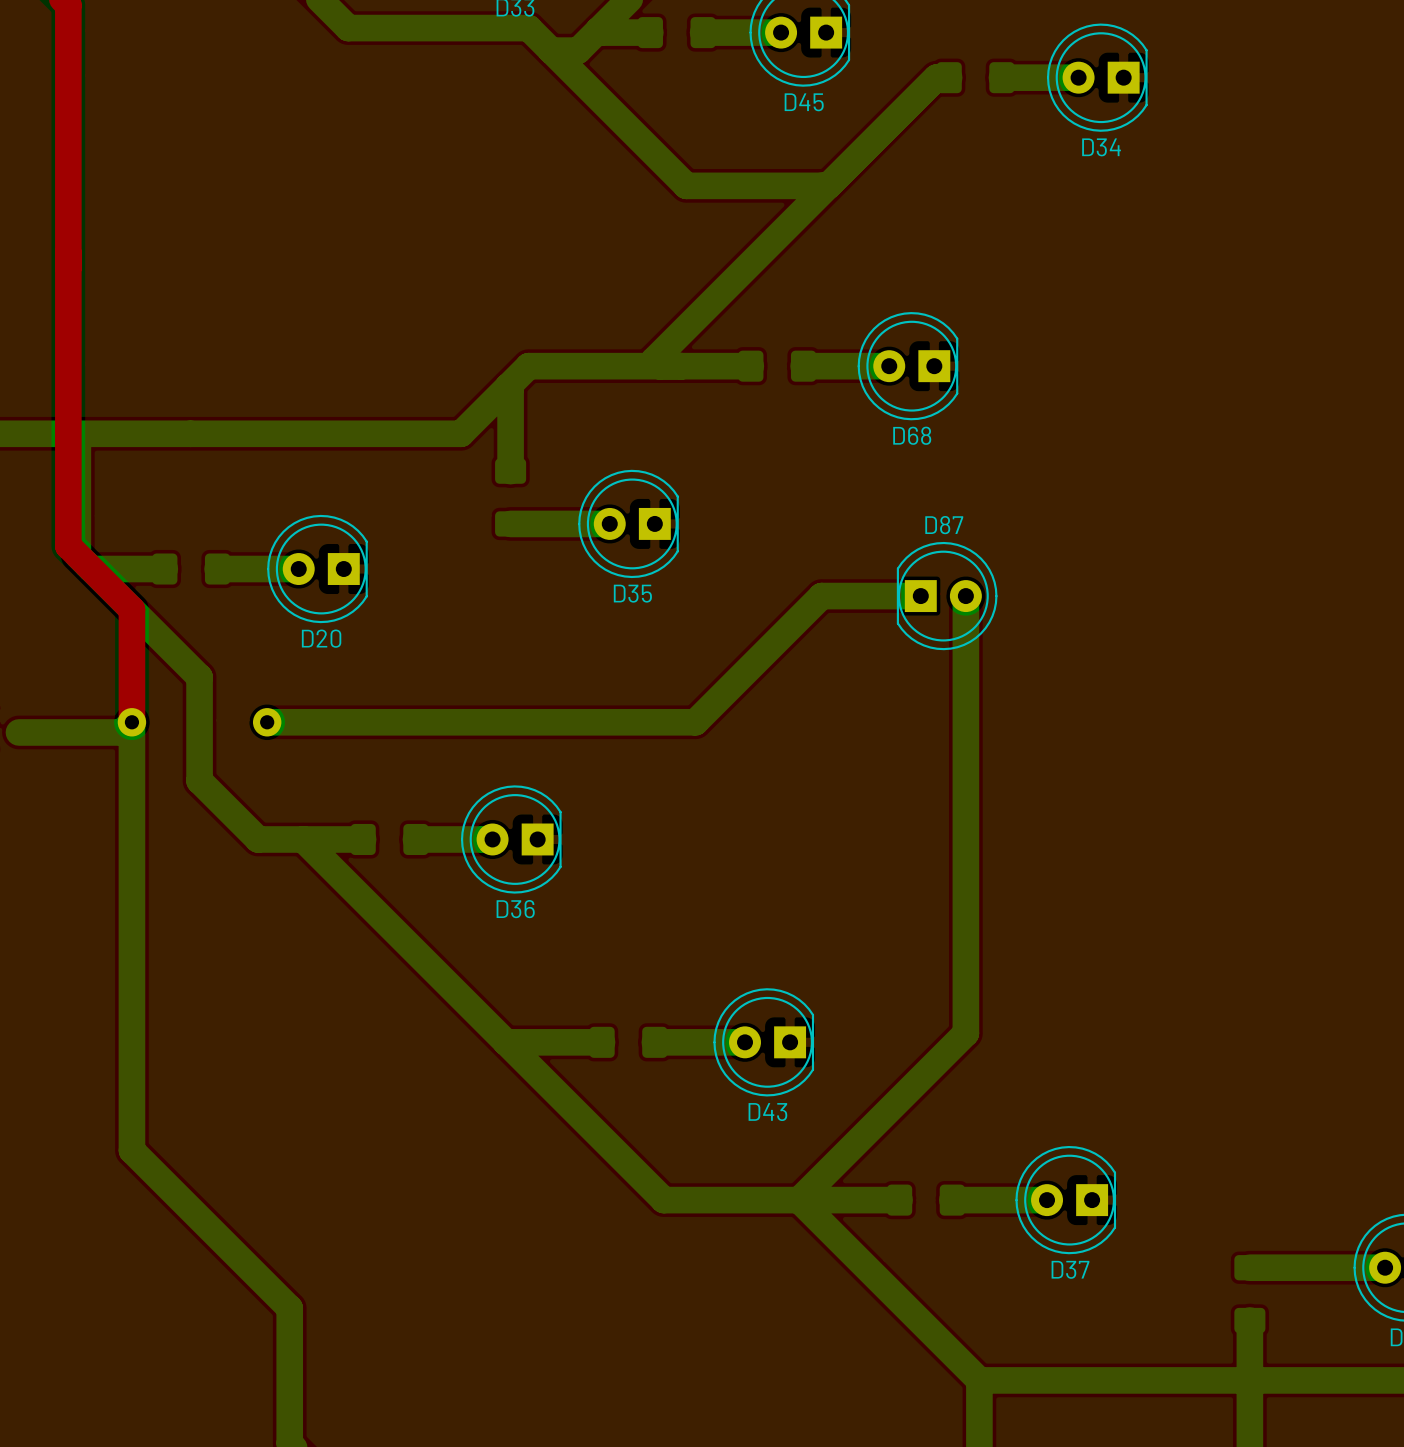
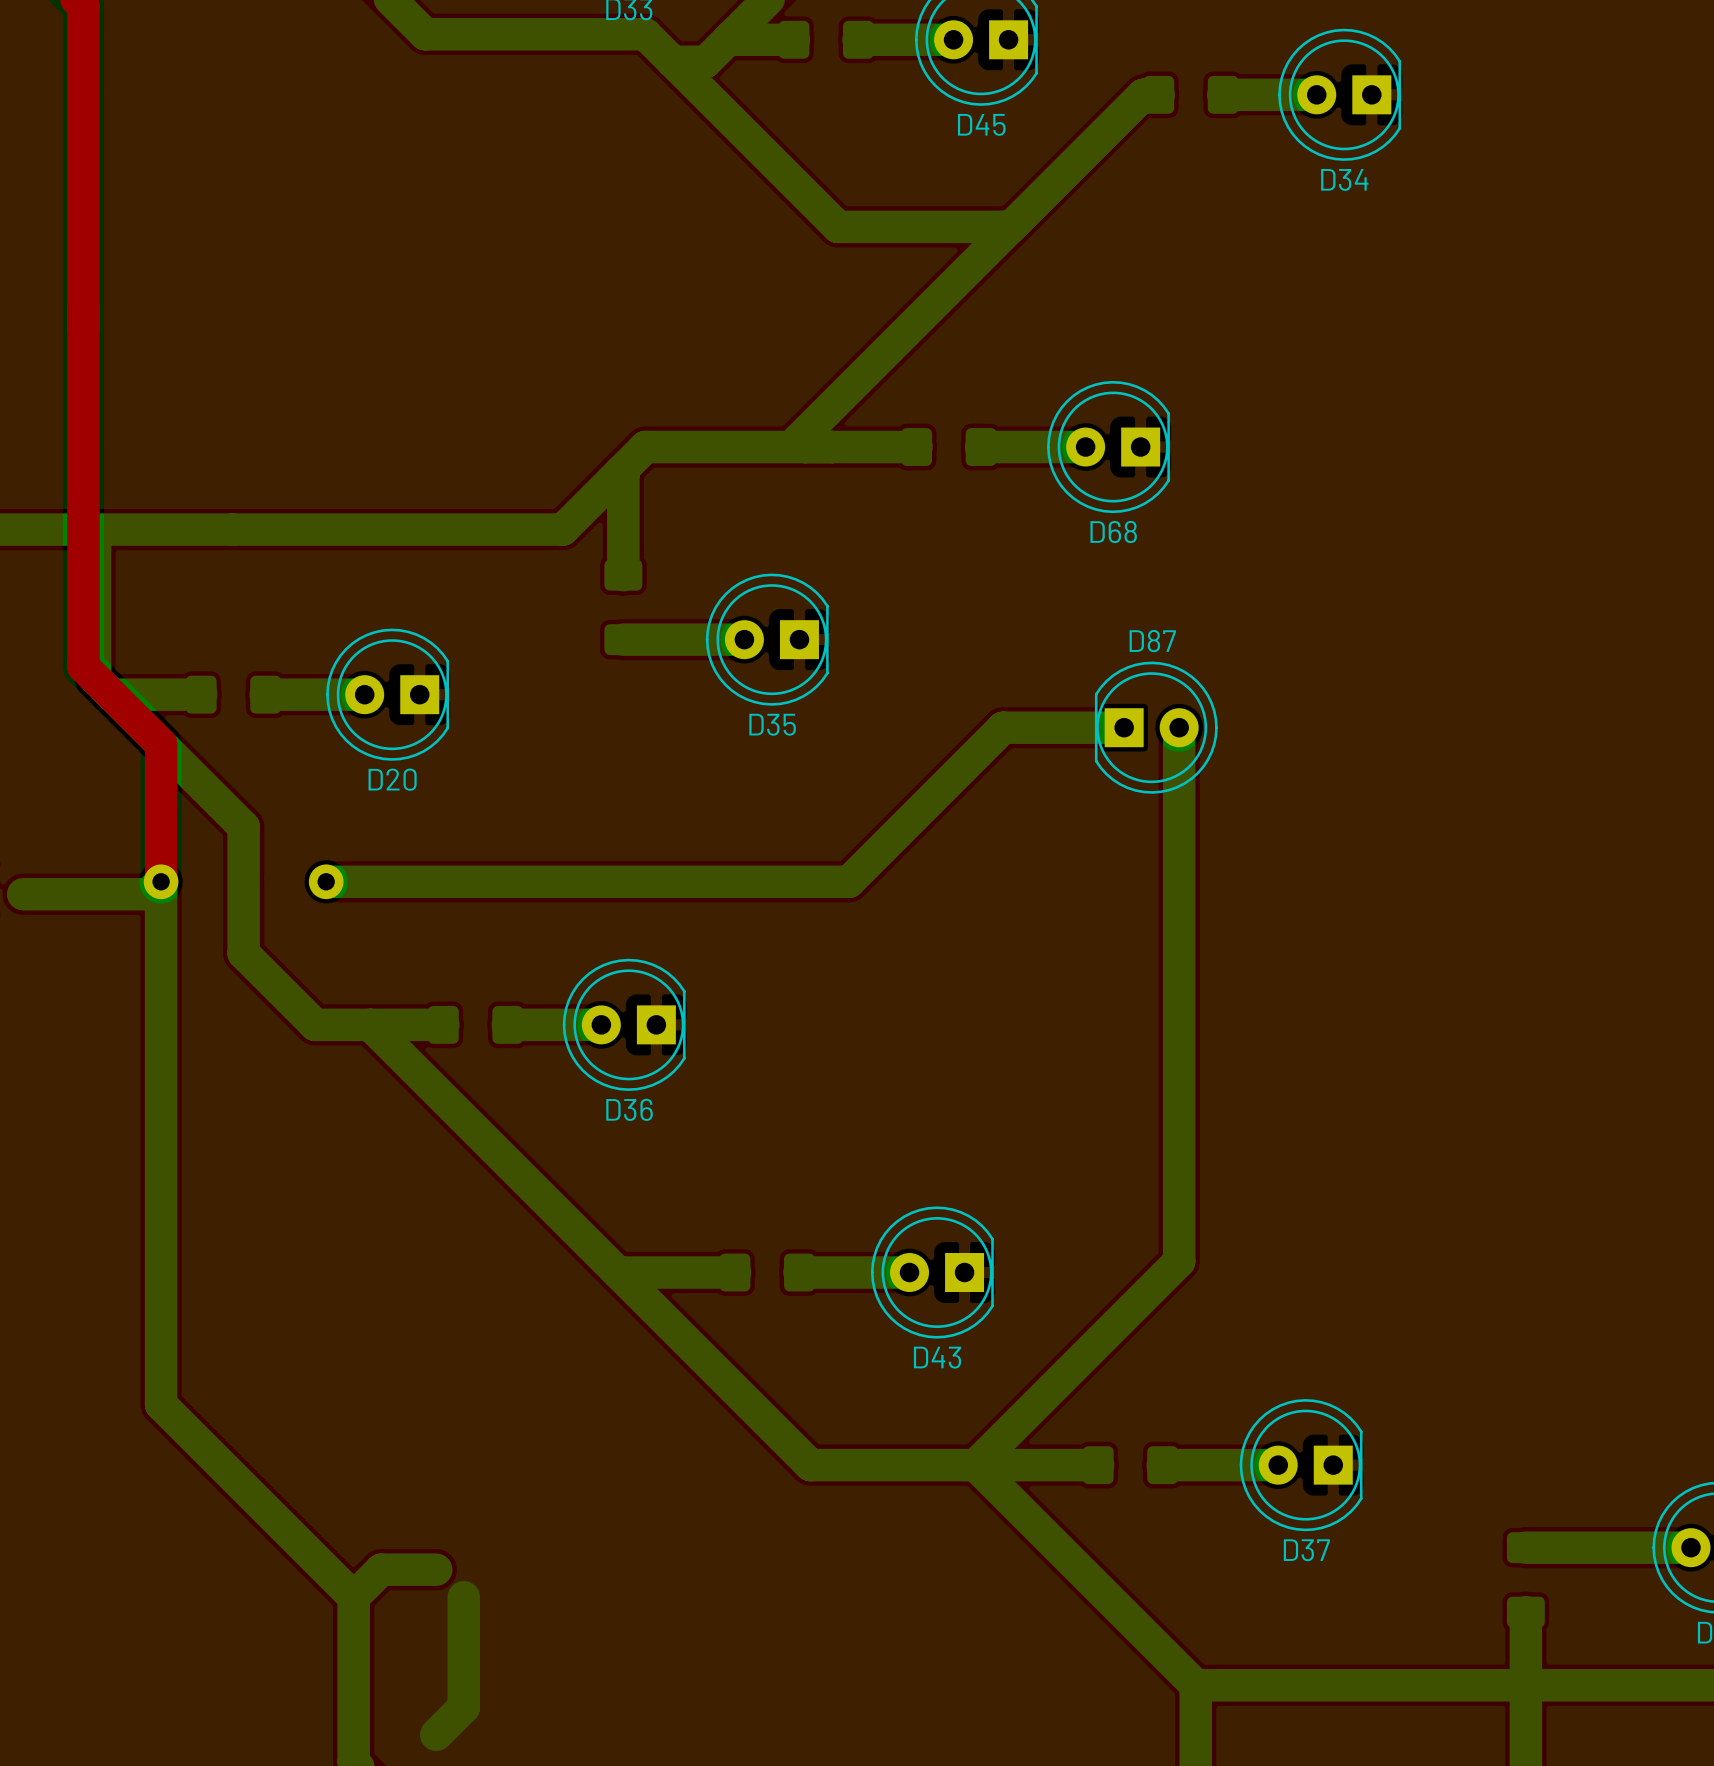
bottom track: none -> (436, 1569) (381, 1569) (353, 1597)
bottom track: none -> (463, 1597) (463, 1707) (436, 1734)

